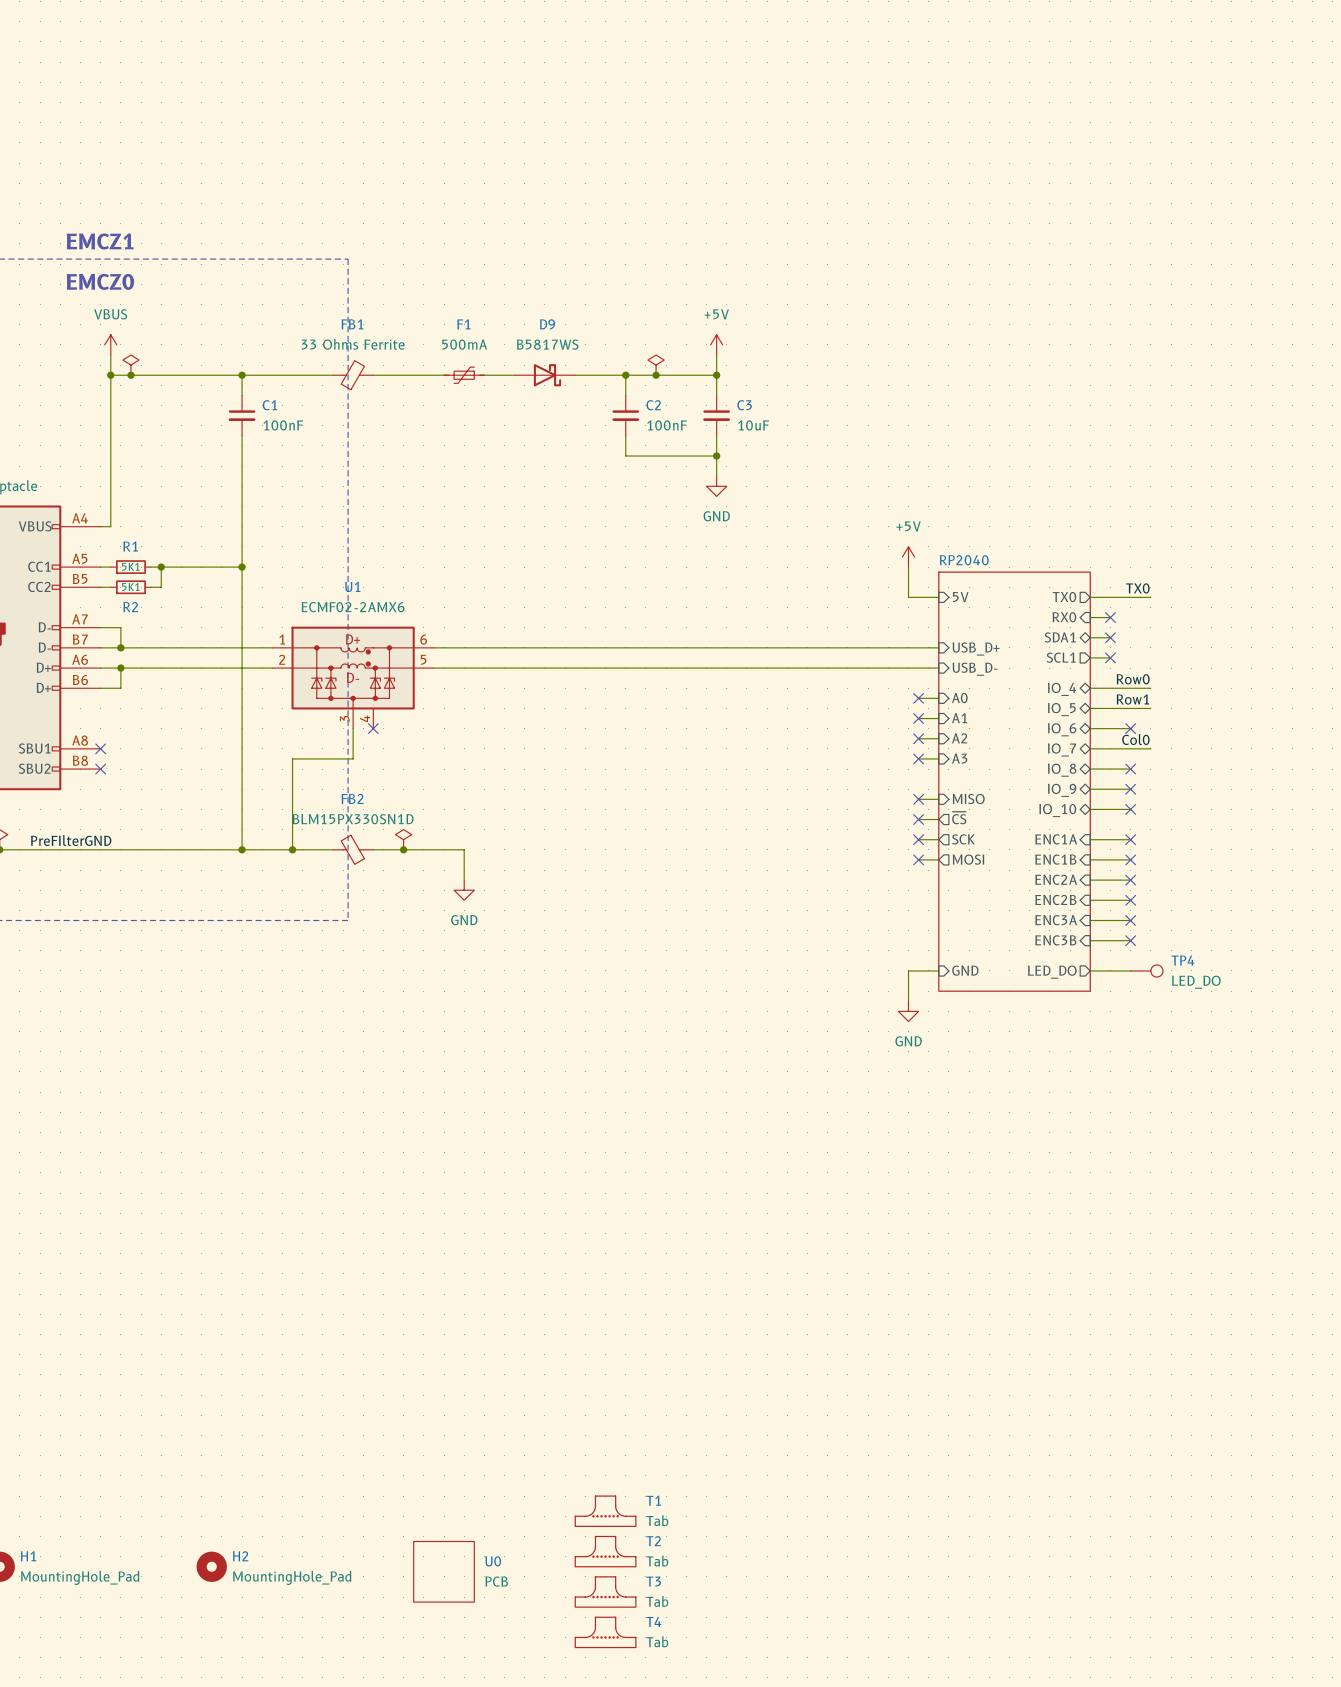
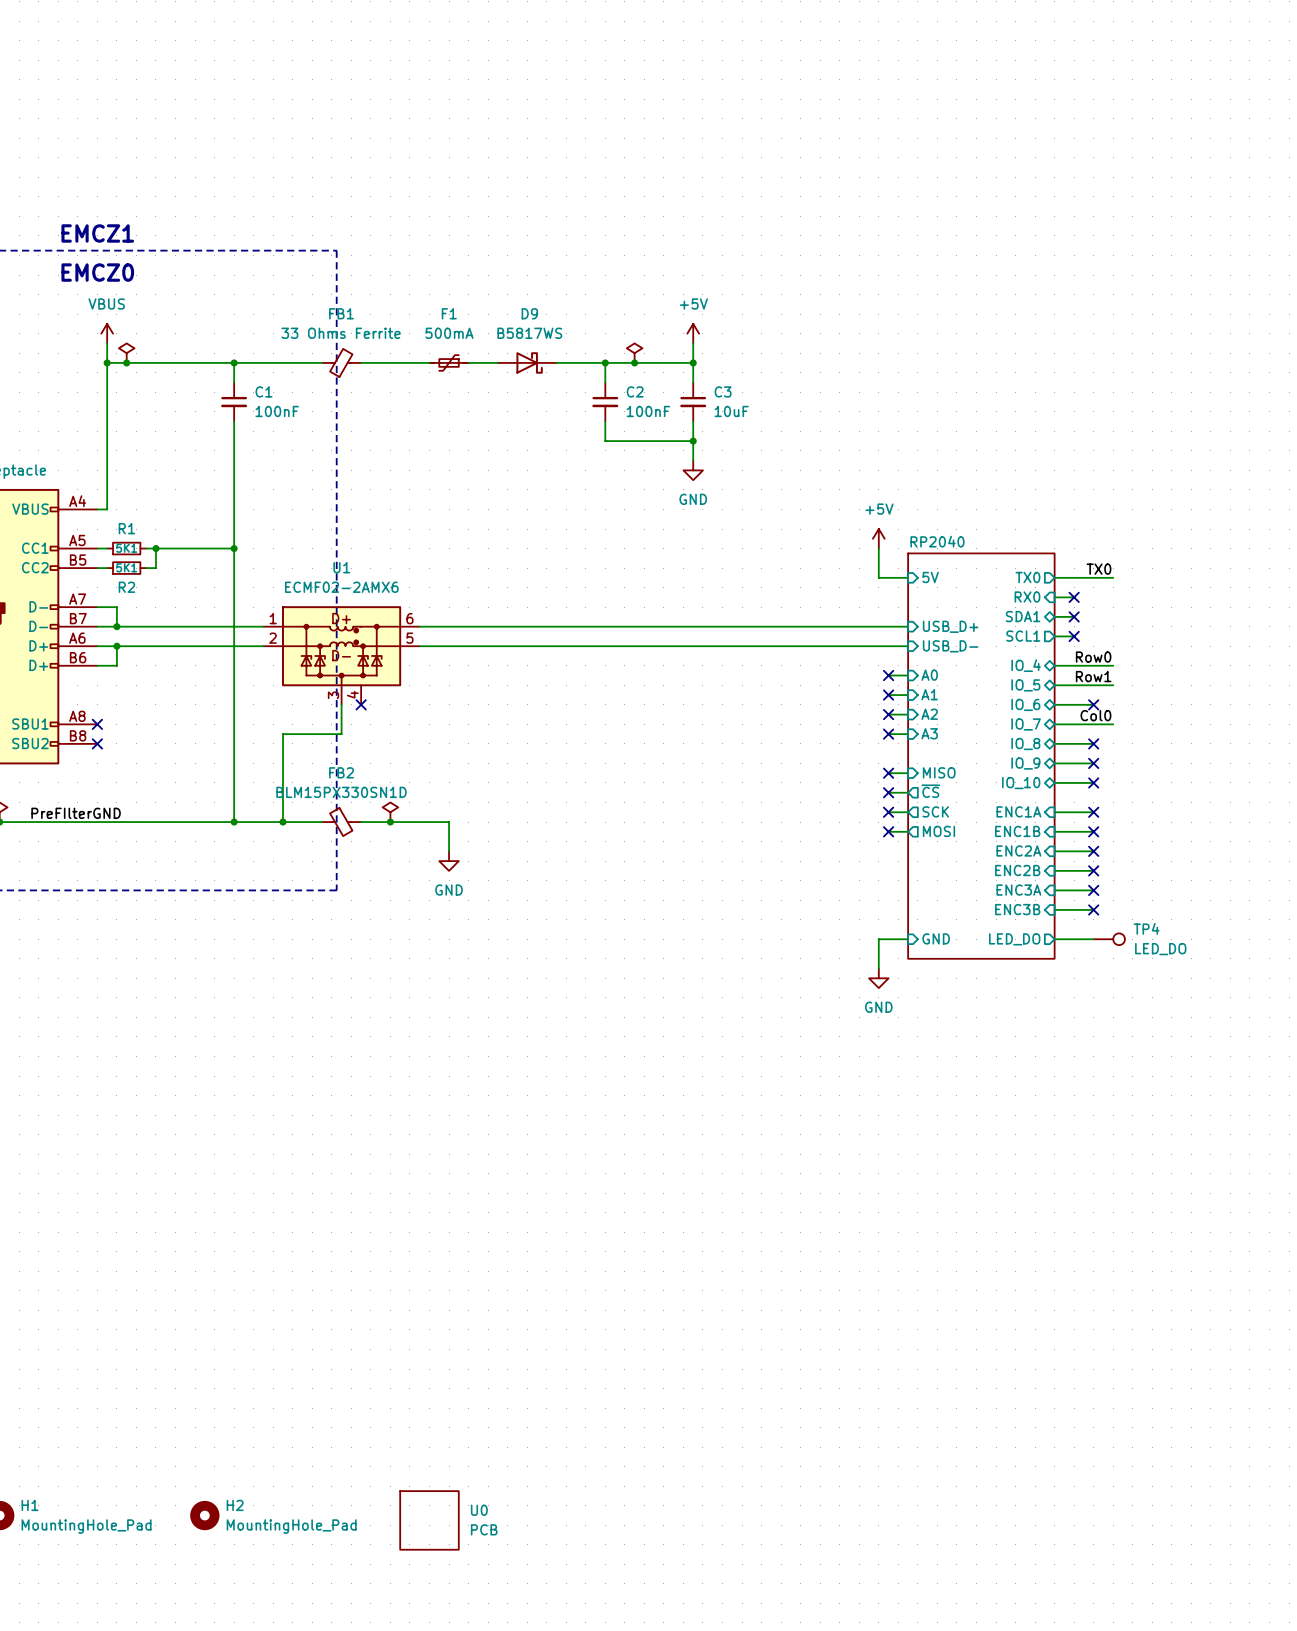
T1: Tab (605, 1511) -> none
T2: Tab (605, 1551) -> none
T3: Tab (605, 1592) -> none
T4: Tab (605, 1632) -> none

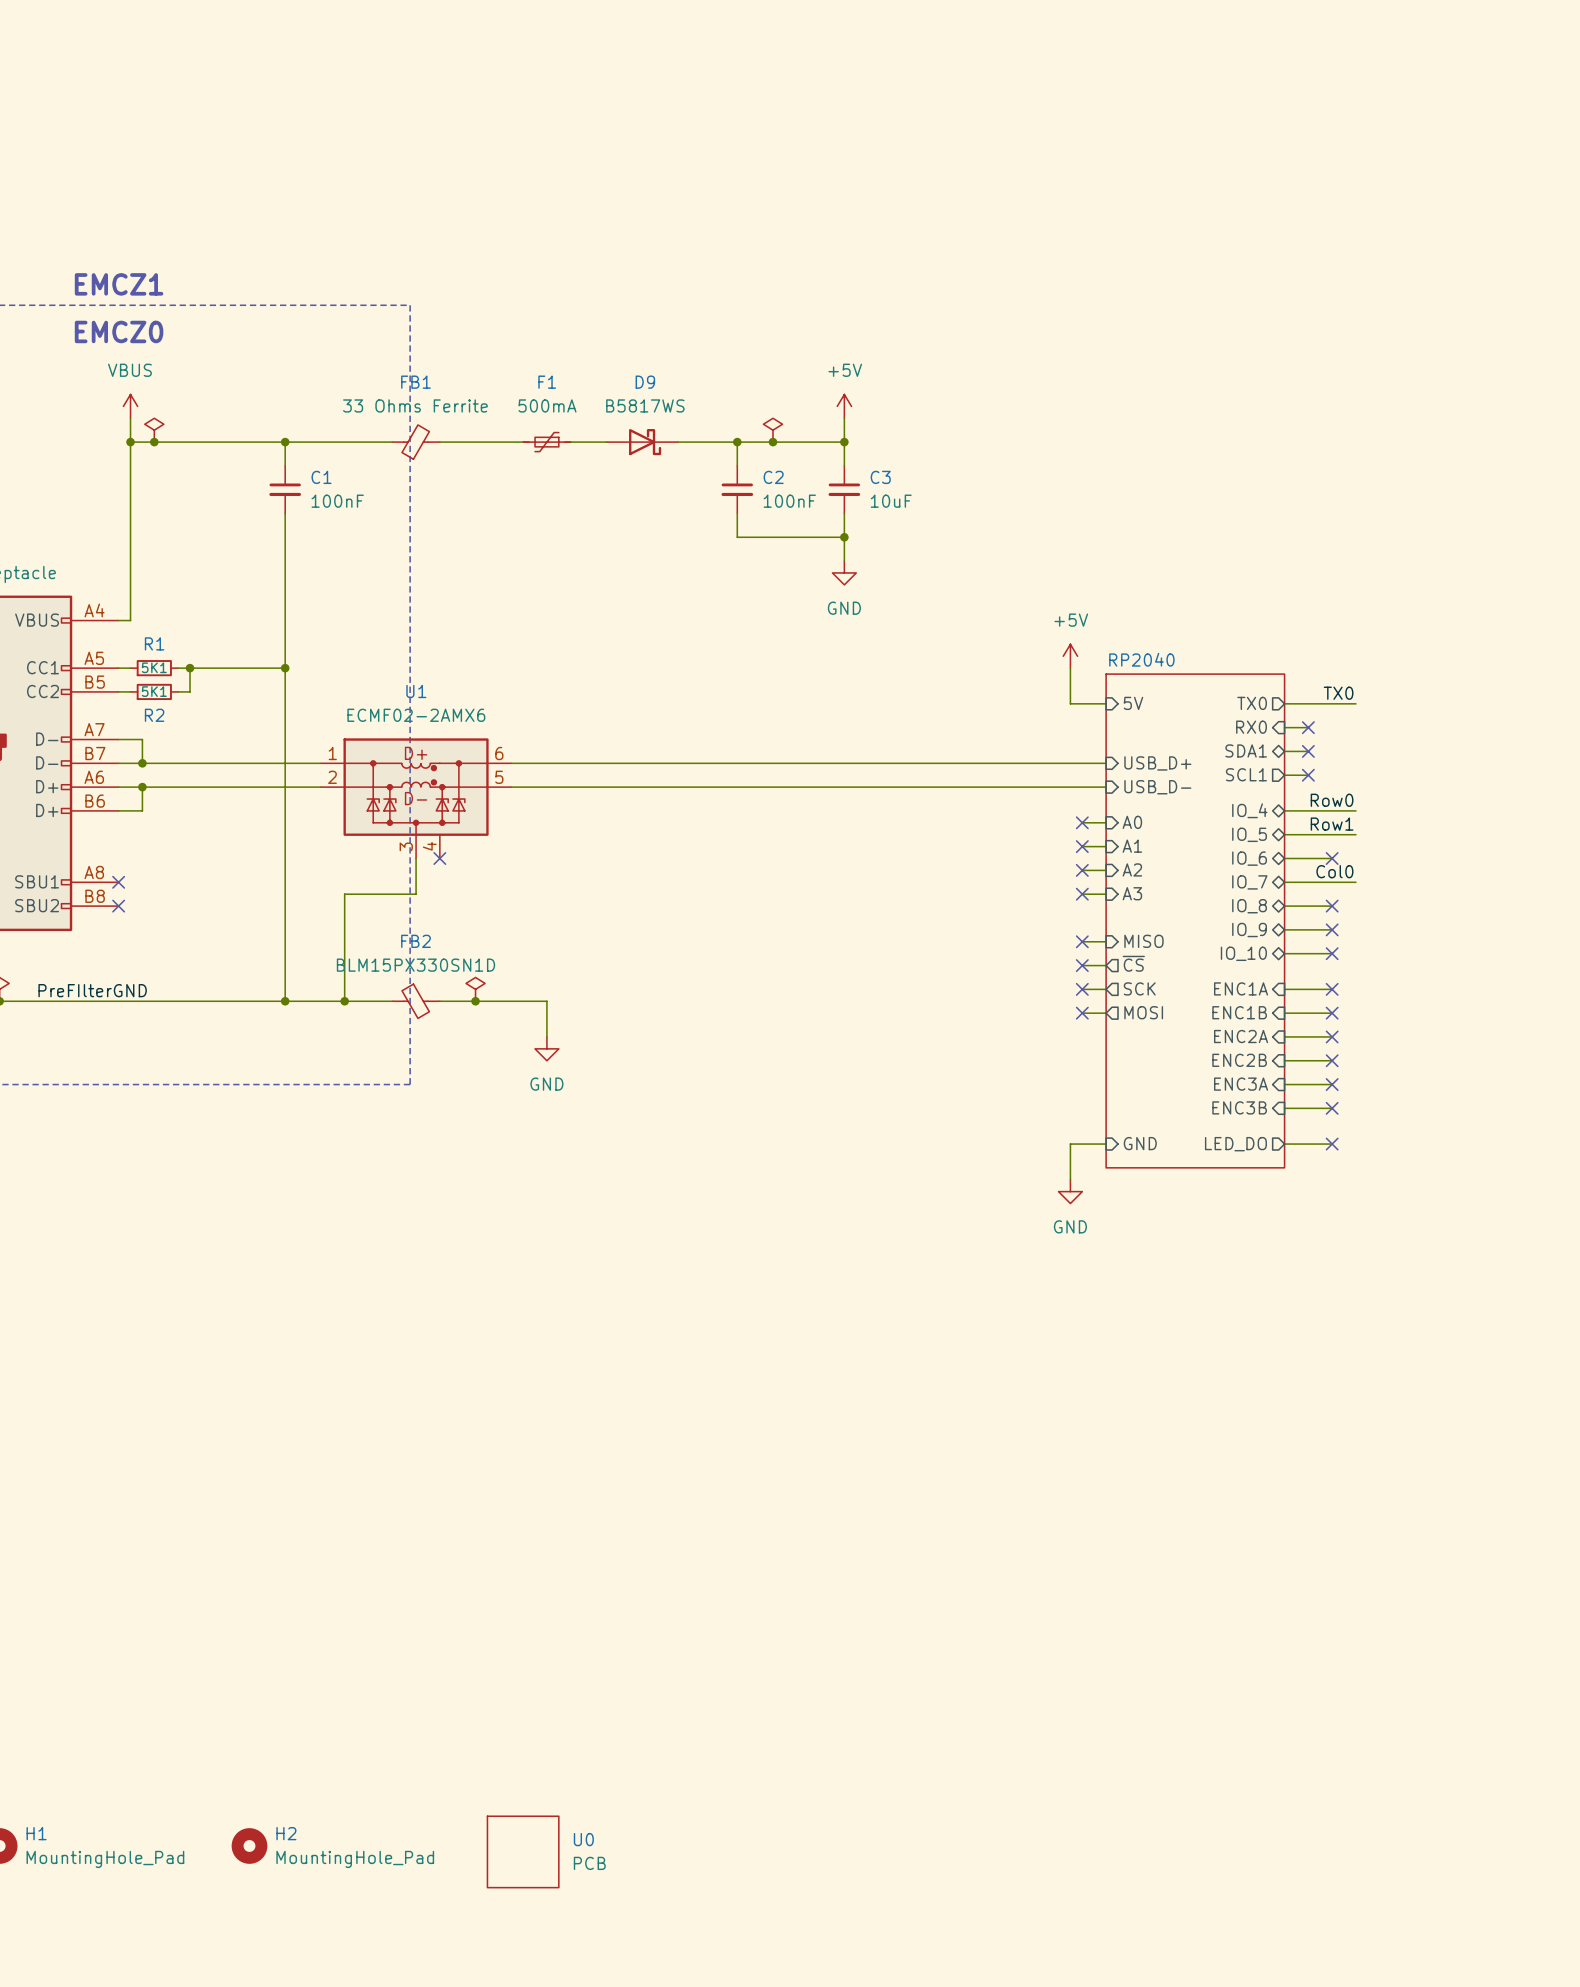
no-connect mark: none -> (1332, 1144)
TP4: LED_DO (1109, 939) -> none

